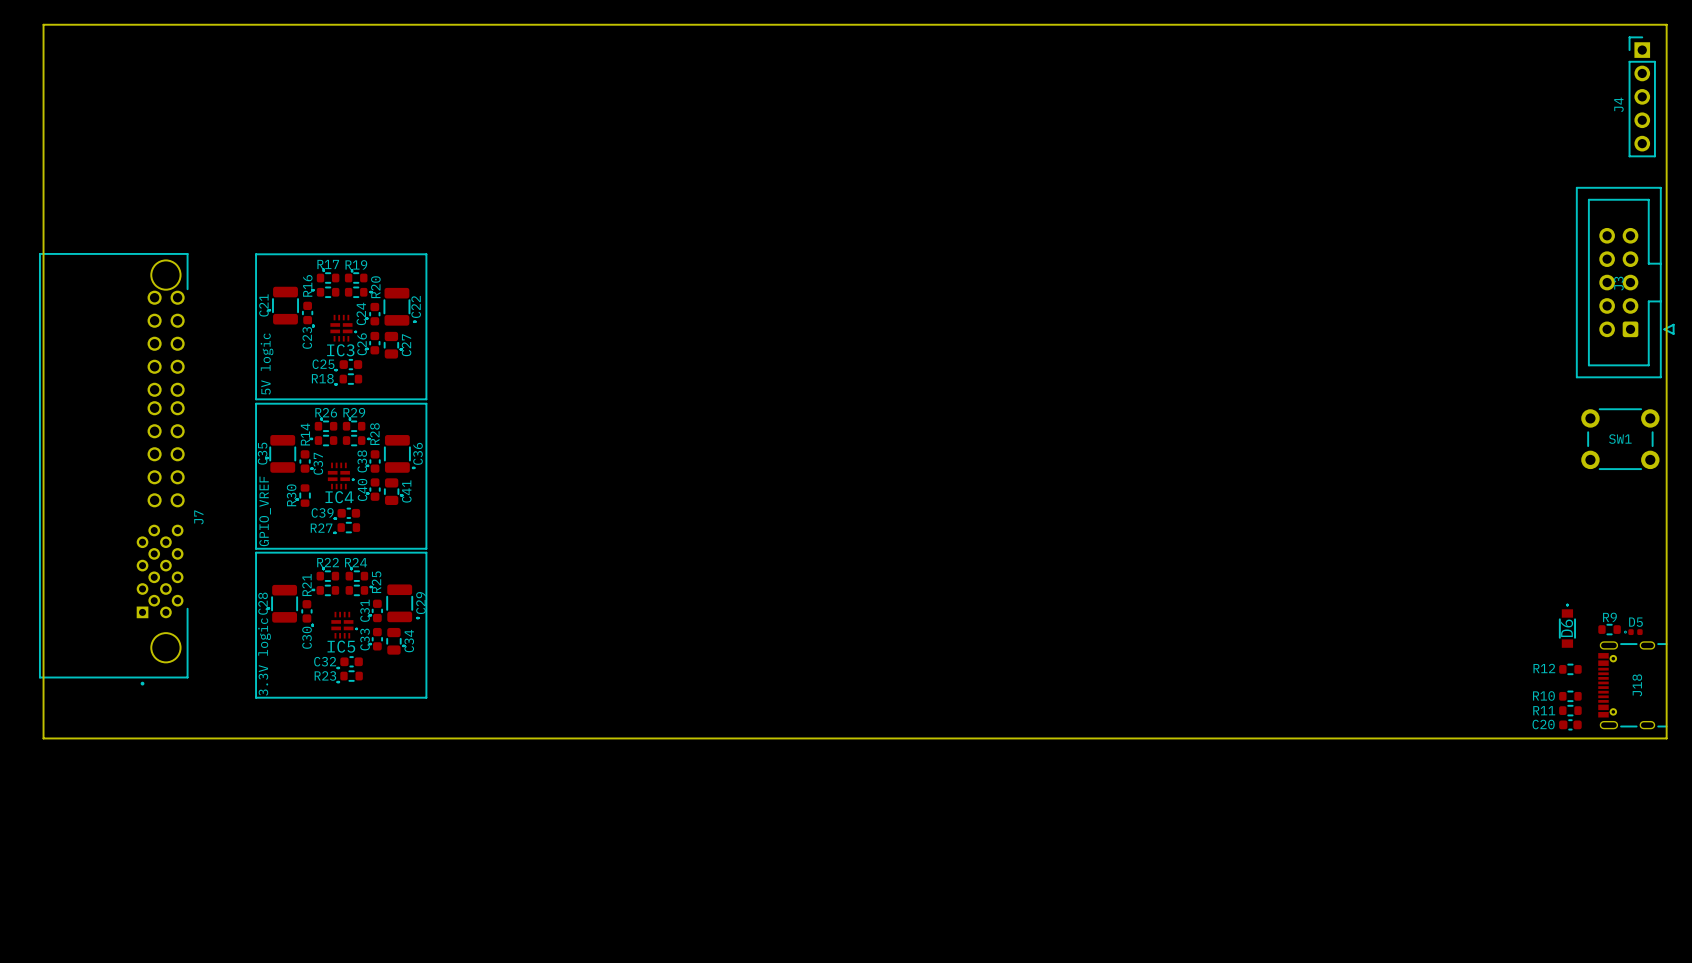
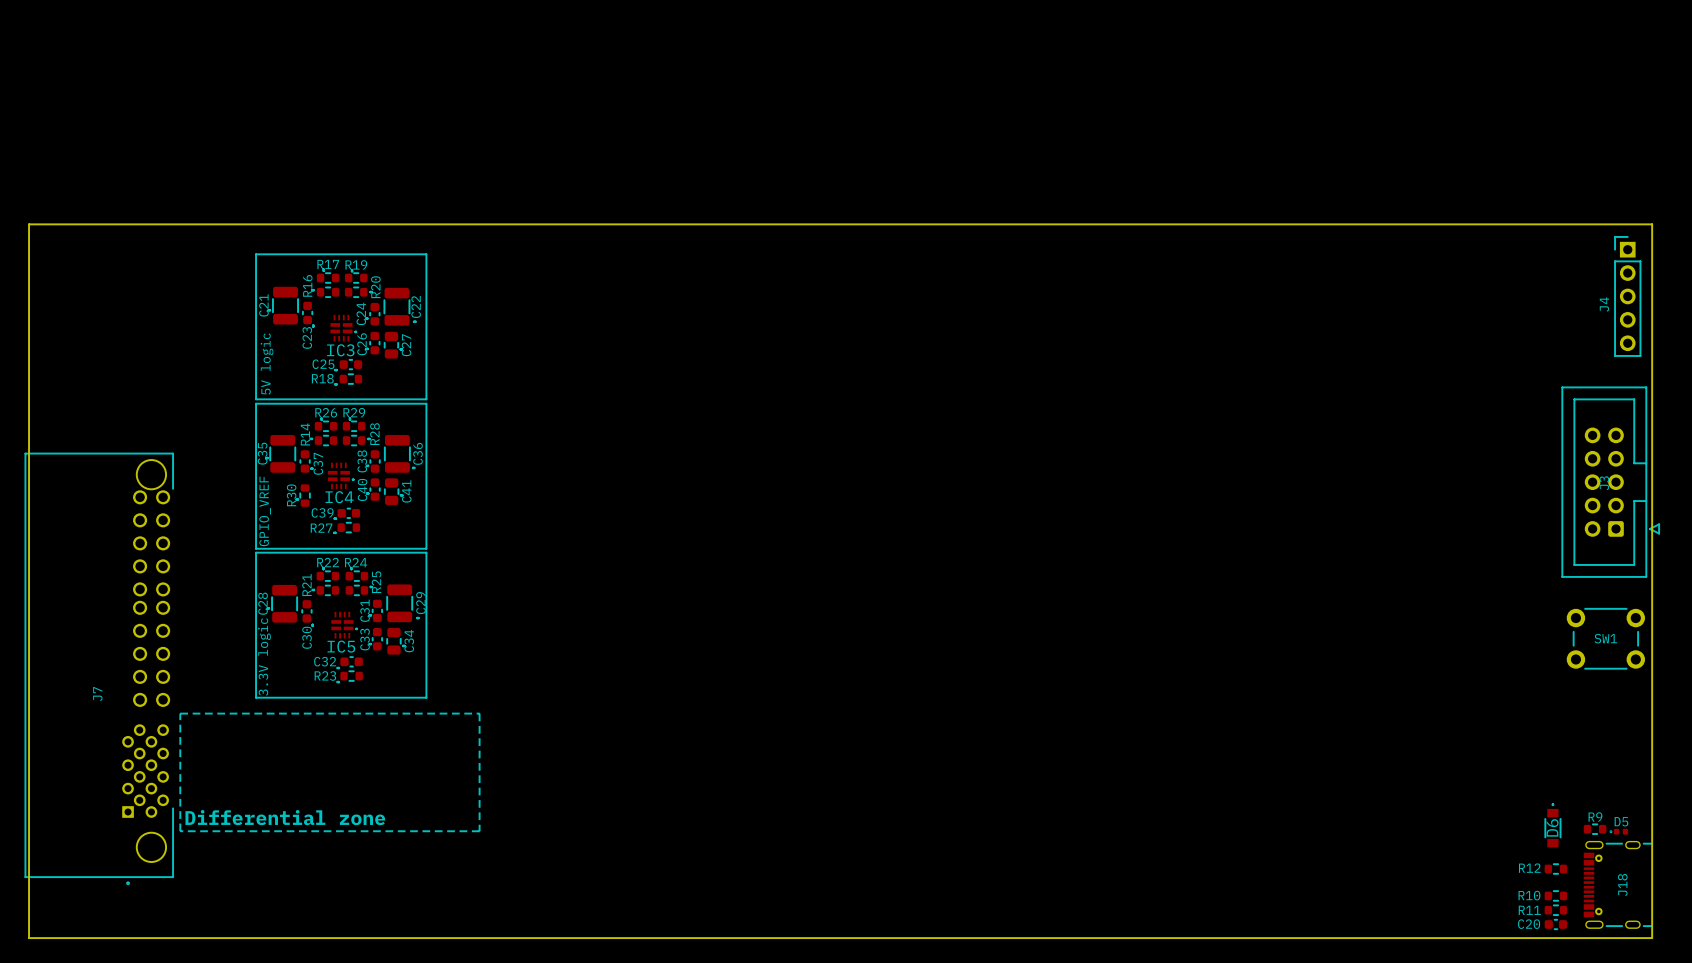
board edge: (43, 24) (1666, 24) (1666, 738) (43, 738) (43, 24) -> (29, 224) (1652, 224) (1652, 938) (29, 938) (29, 224)
J4 position: (1642, 96) -> (1627, 296)
J3 position: (1625, 282) -> (1610, 482)
SW1 position: (1620, 439) -> (1605, 638)
J7 position: (113, 469) -> (99, 668)
J7 name position: J7 (198, 517) -> J7 (97, 693)
D6 position: (1567, 625) -> (1552, 825)
R9 position: (1609, 629) -> (1595, 829)
D5 position: (1633, 632) -> (1619, 831)
R12 position: (1570, 669) -> (1555, 869)
J18 position: (1632, 685) -> (1618, 884)
R10 position: (1570, 696) -> (1555, 895)
R11 position: (1570, 710) -> (1555, 910)
line: none -> (180, 713) (479, 713) (479, 831) (180, 831) (180, 713)
C20 position: (1570, 724) -> (1555, 924)
text: none -> Differential zone (285, 817)

